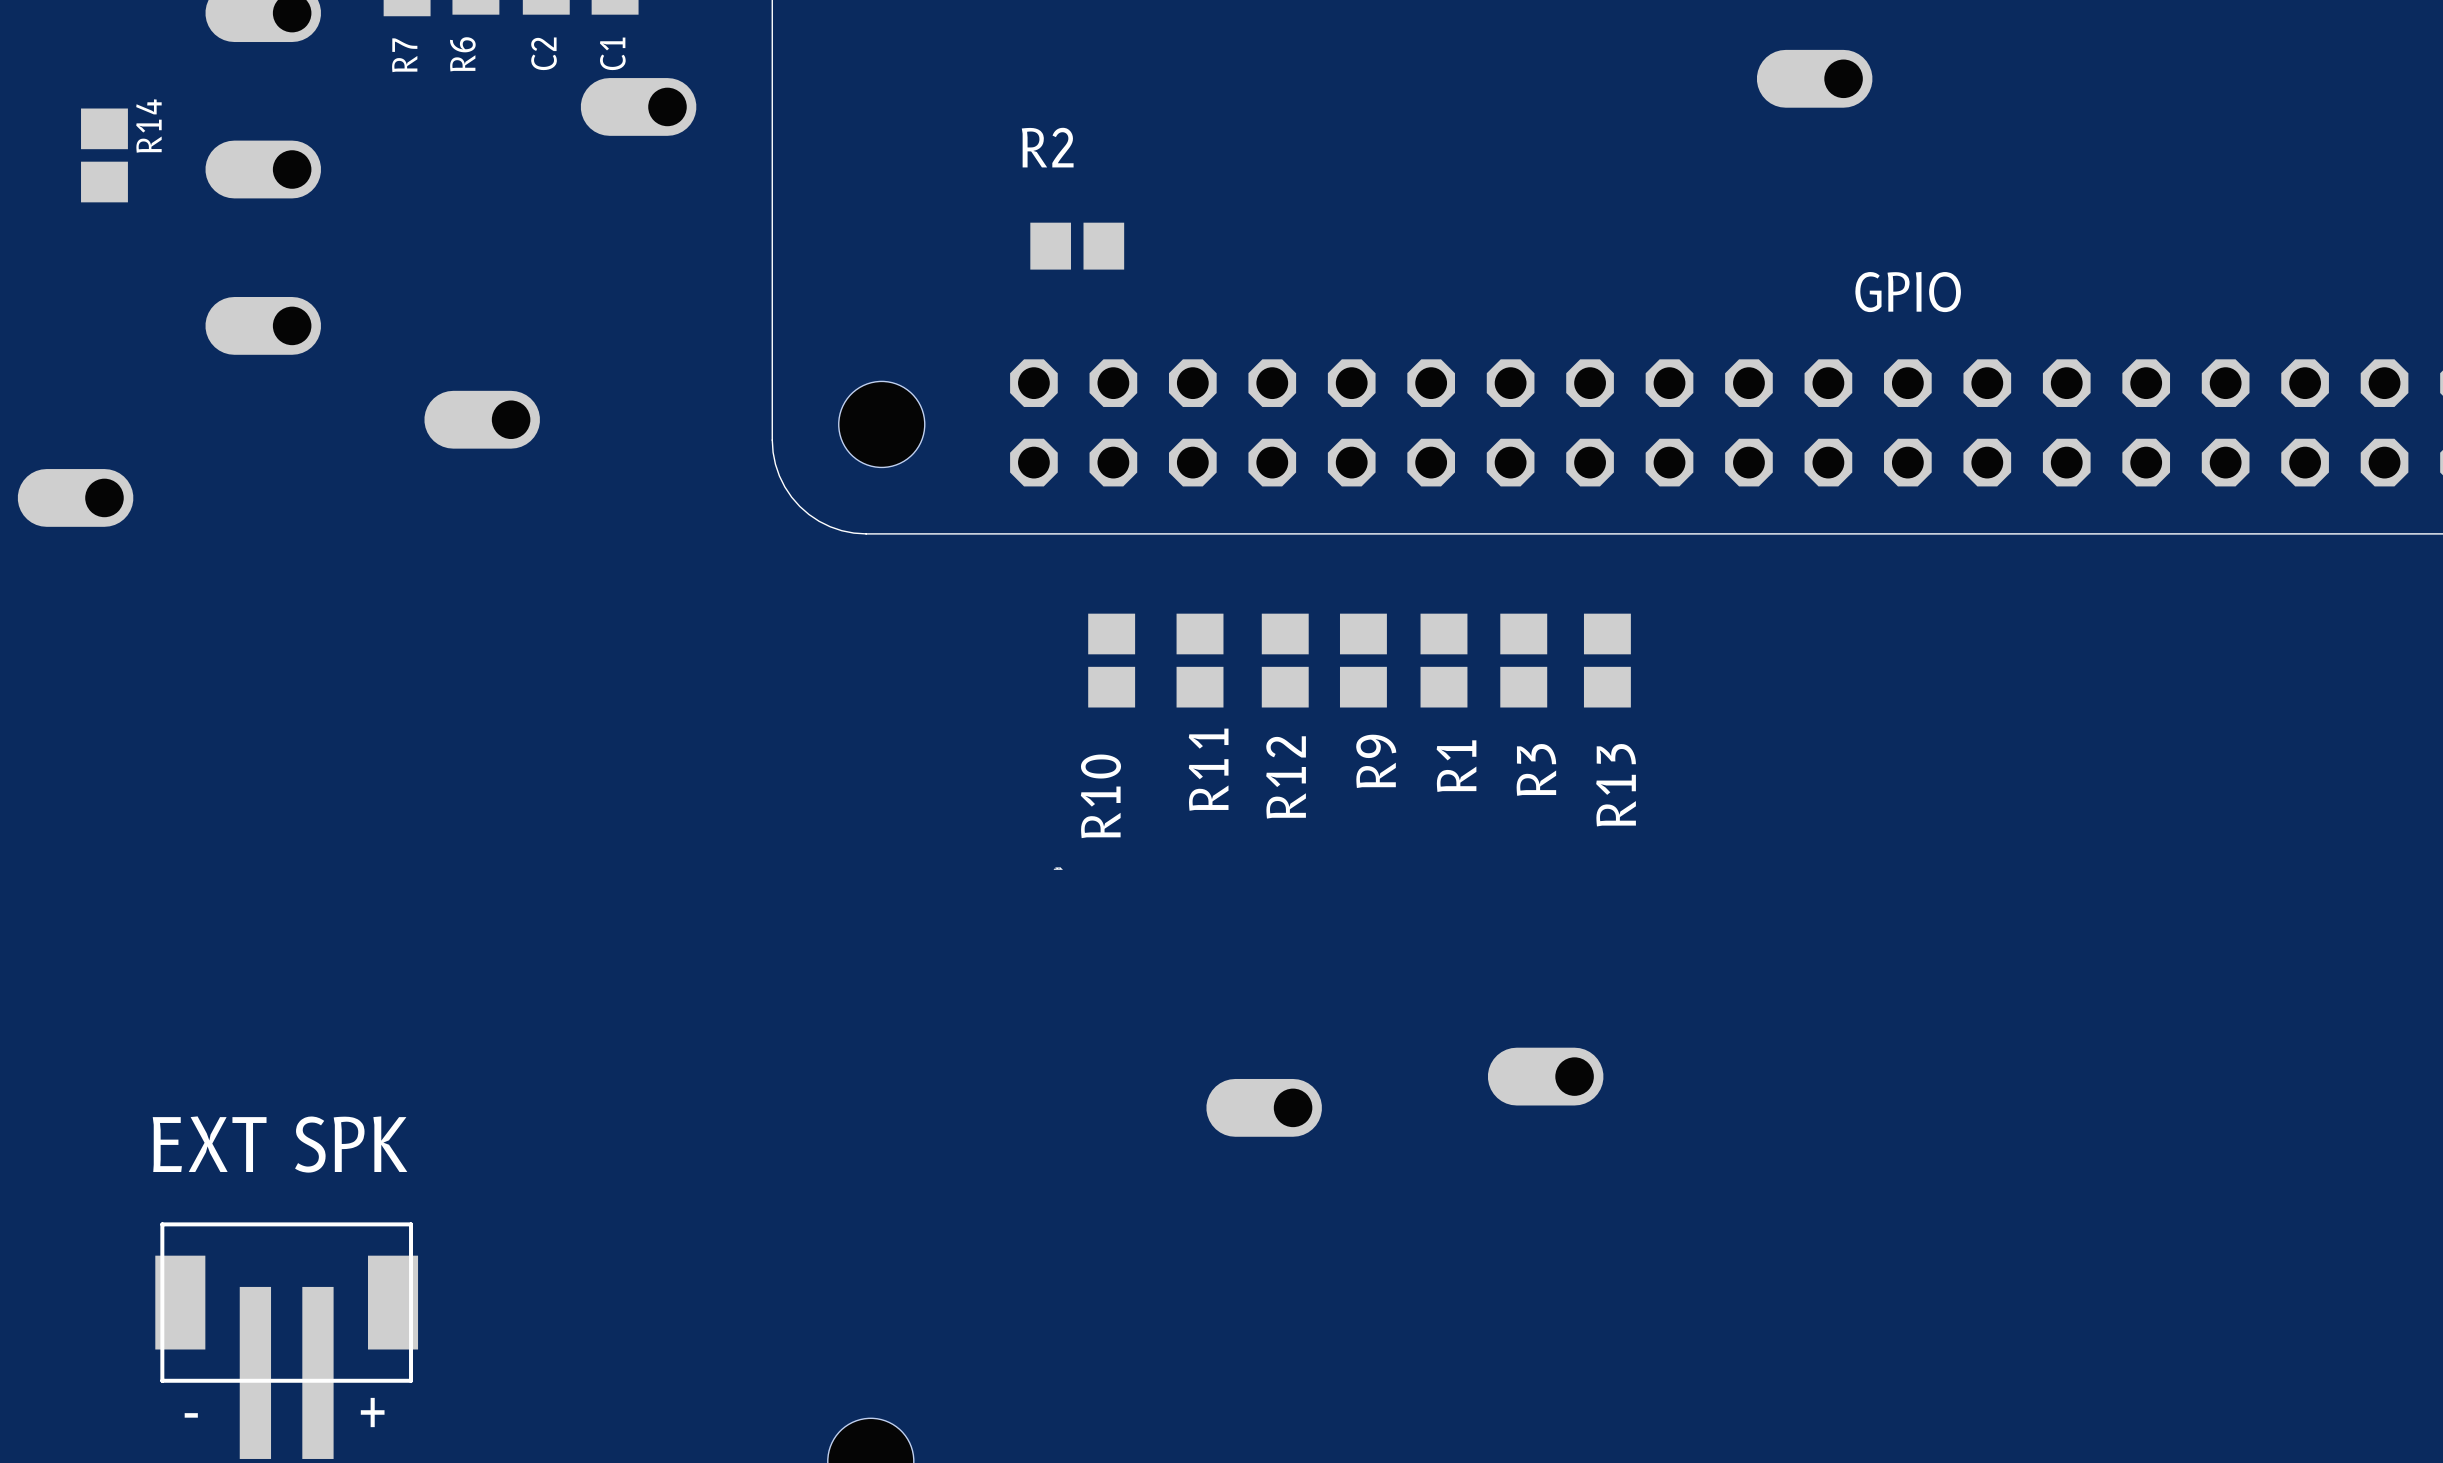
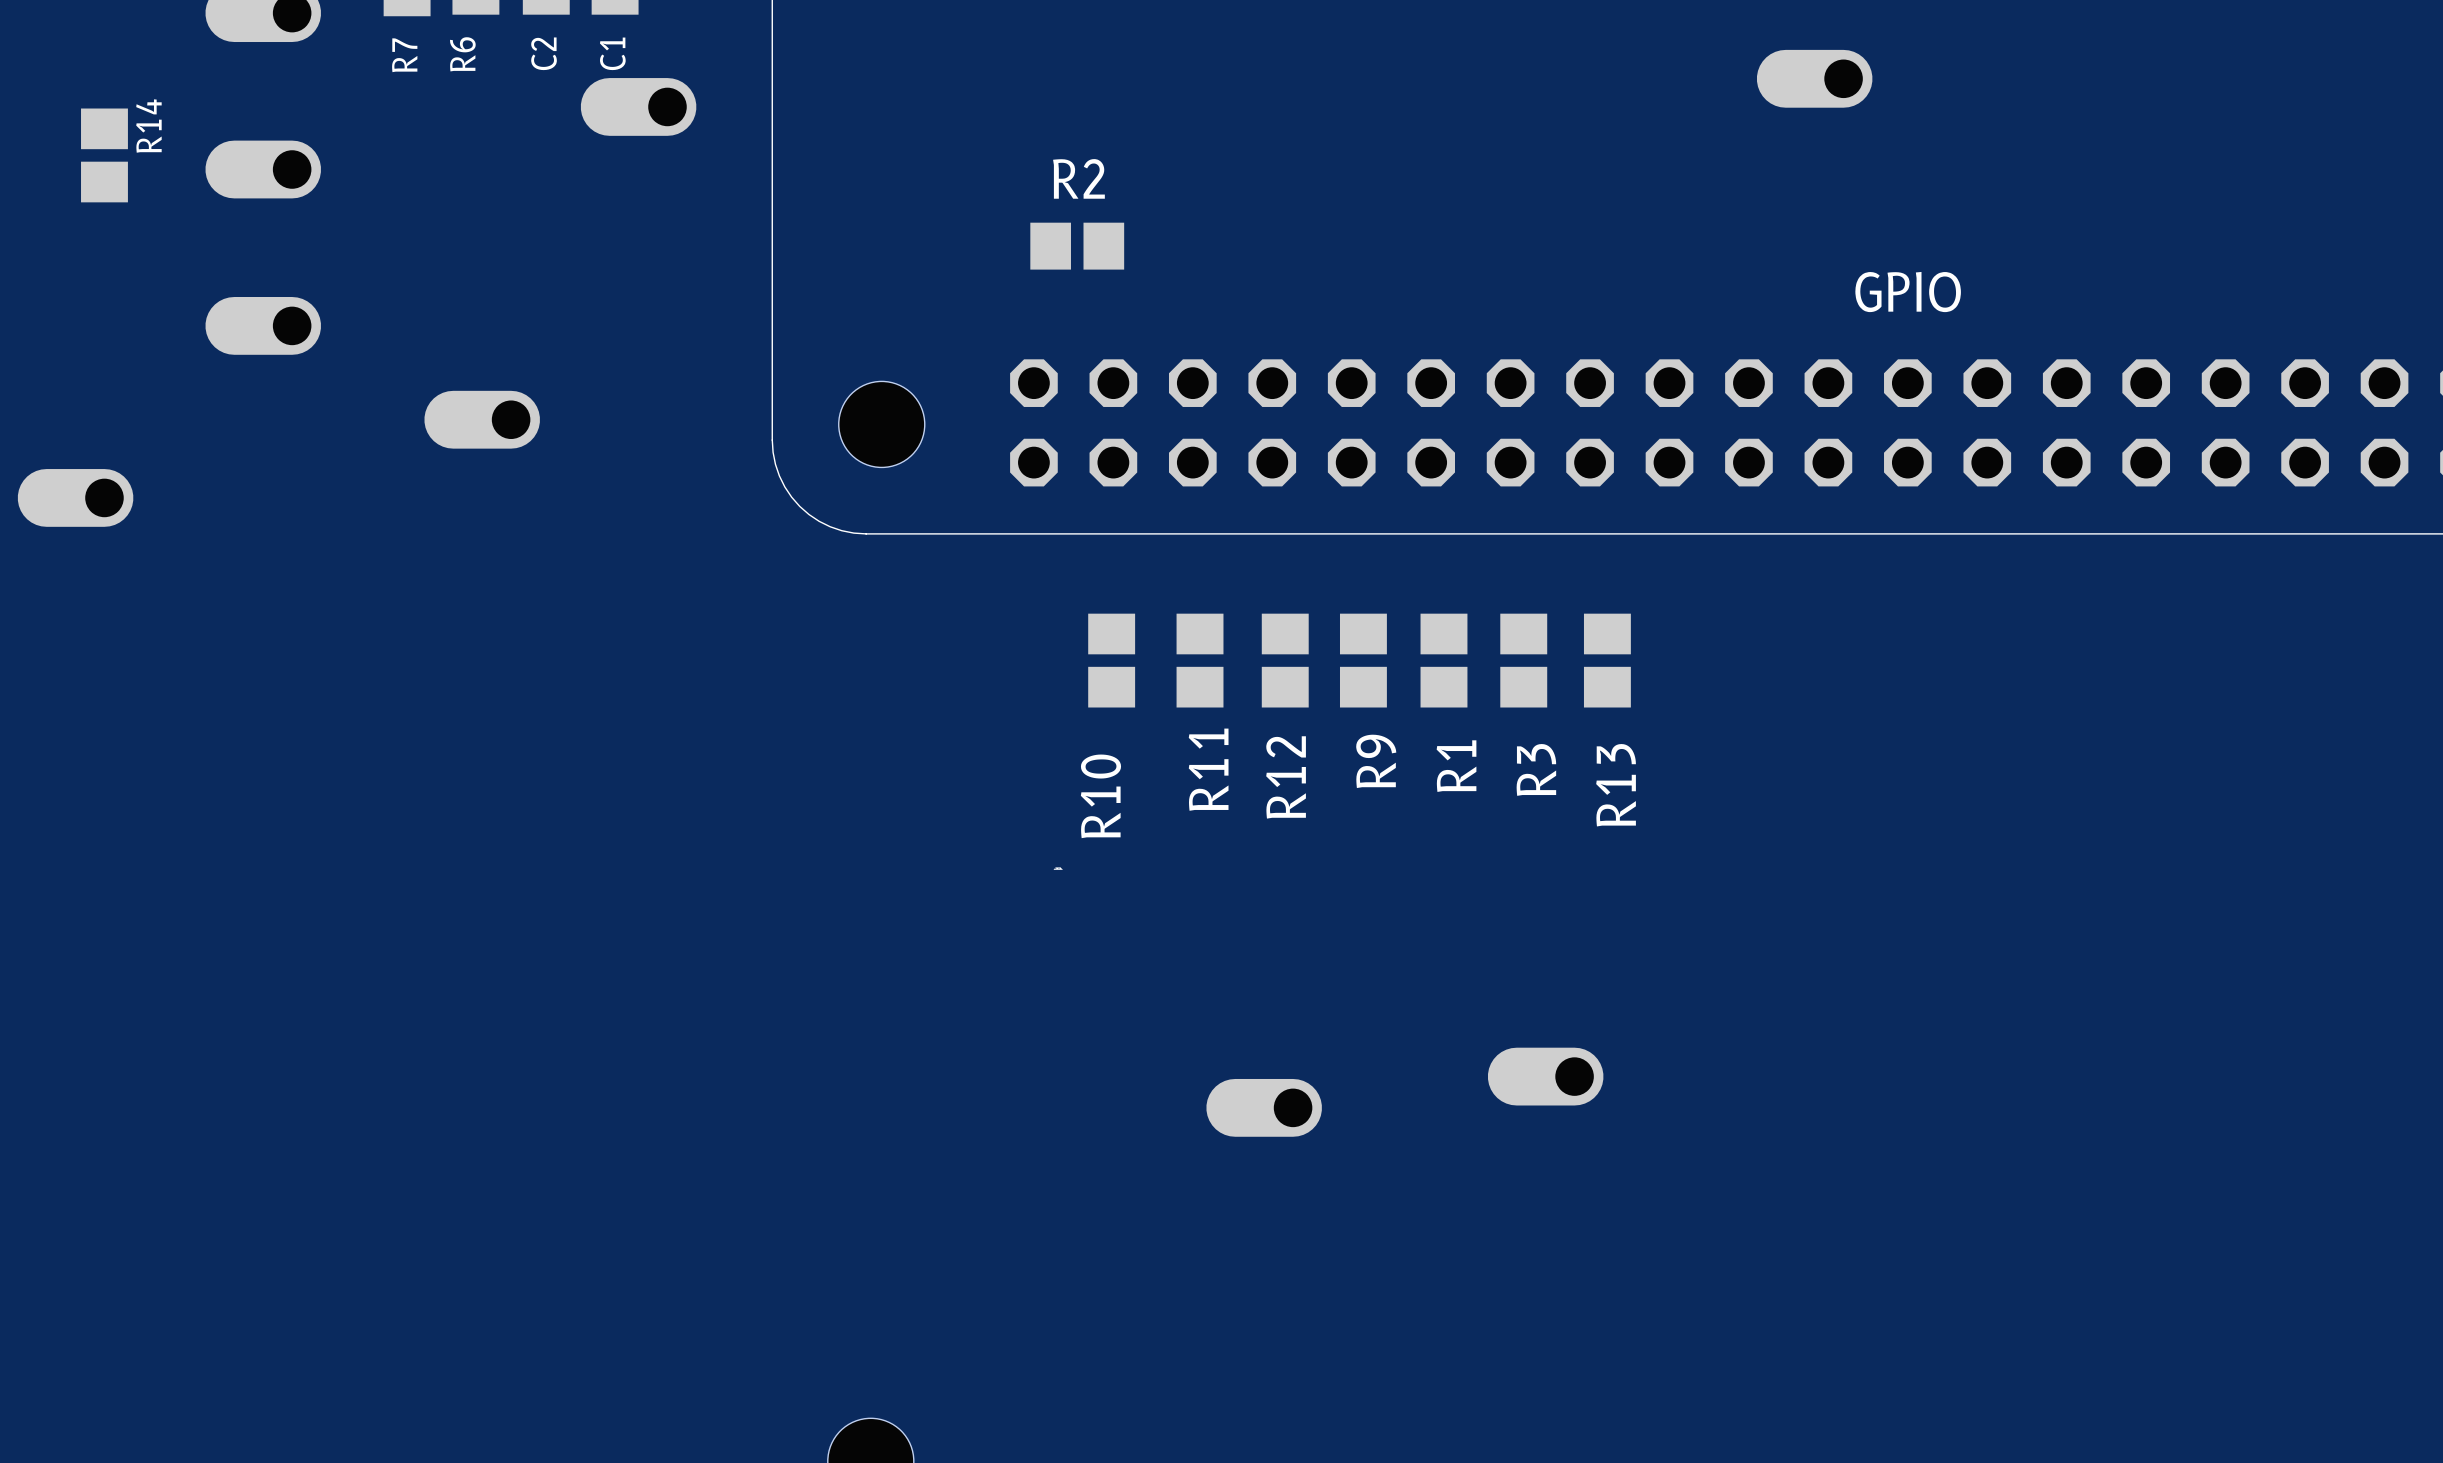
R2 name position: R2 (1047, 147) -> R2 (1078, 178)
text: EXT SPK (280, 1144) -> none
part: (286, 1340) -> none

